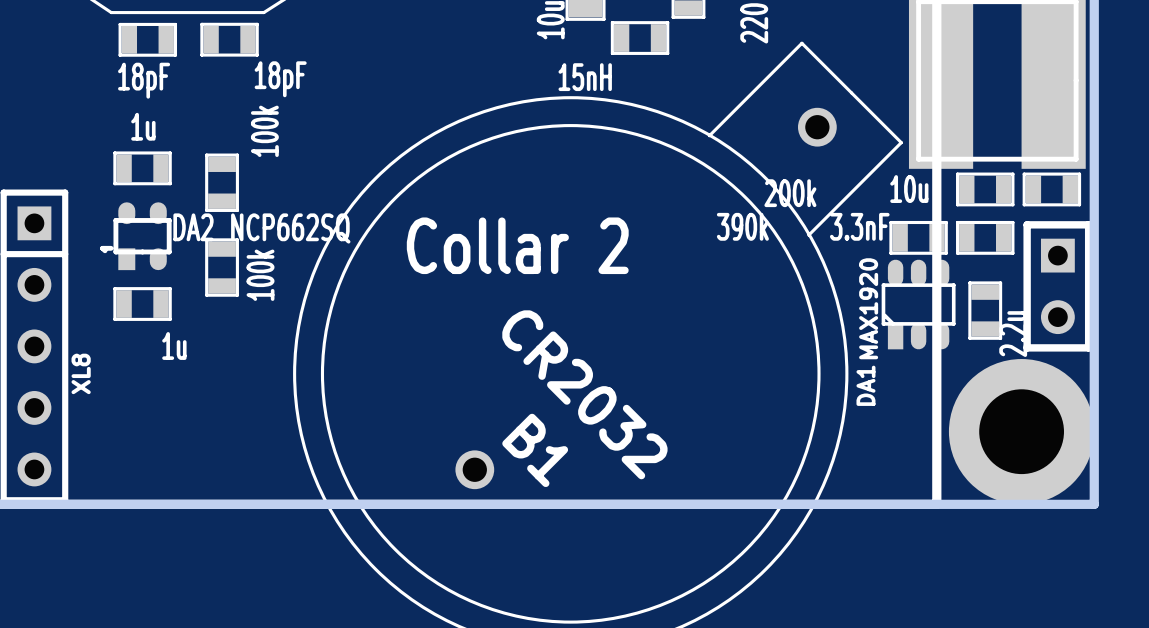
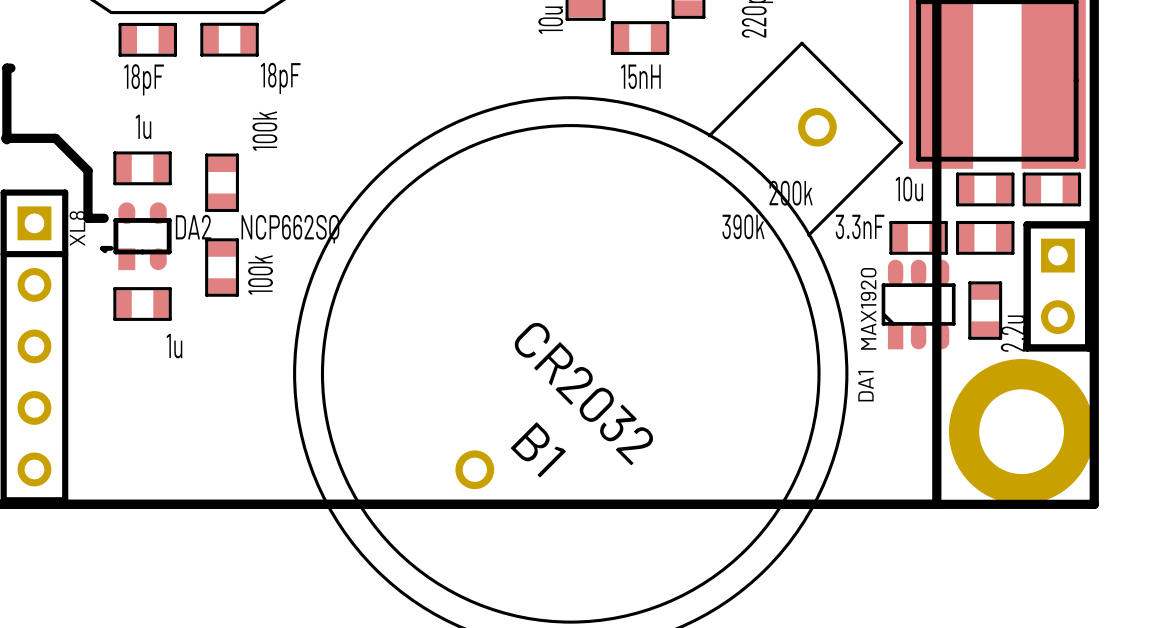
line: none -> (10, 68) (6, 68) (6, 139)
part value position: 15nH (585, 77) -> 15nH (640, 76)
line: none -> (5, 138) (55, 138) (87, 170) (87, 218) (104, 218)
text: Collar 2 (517, 245) -> none
XL8 name position: XL8 (81, 373) -> XL8 (77, 228)

